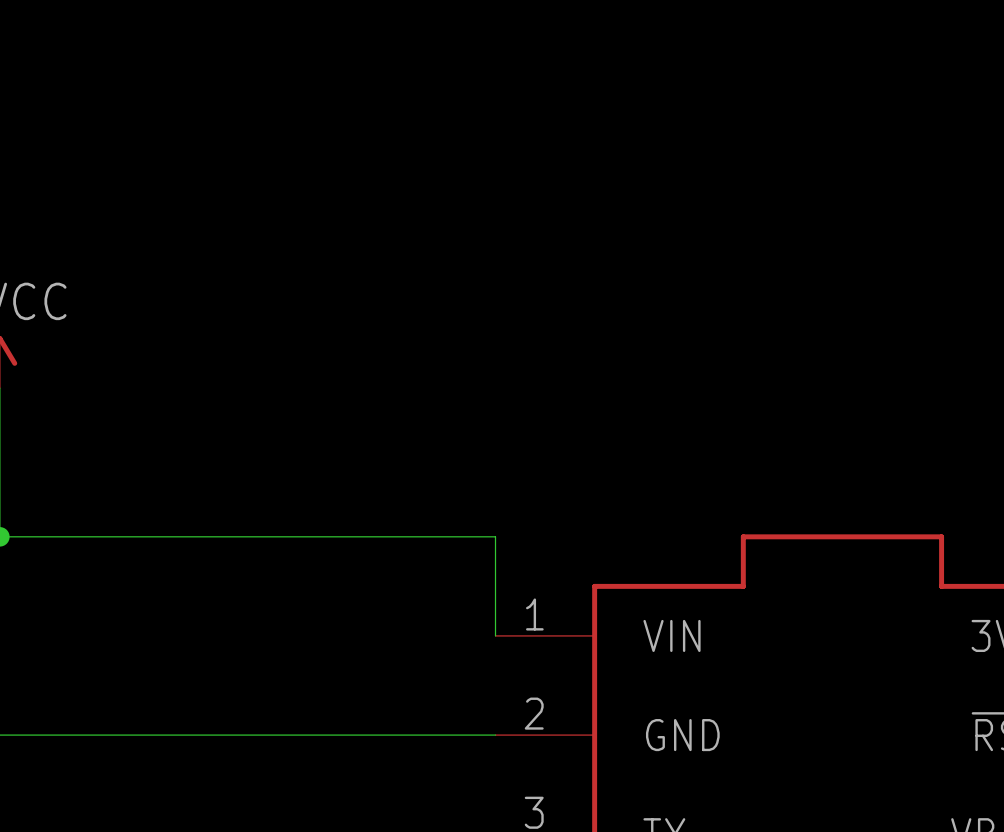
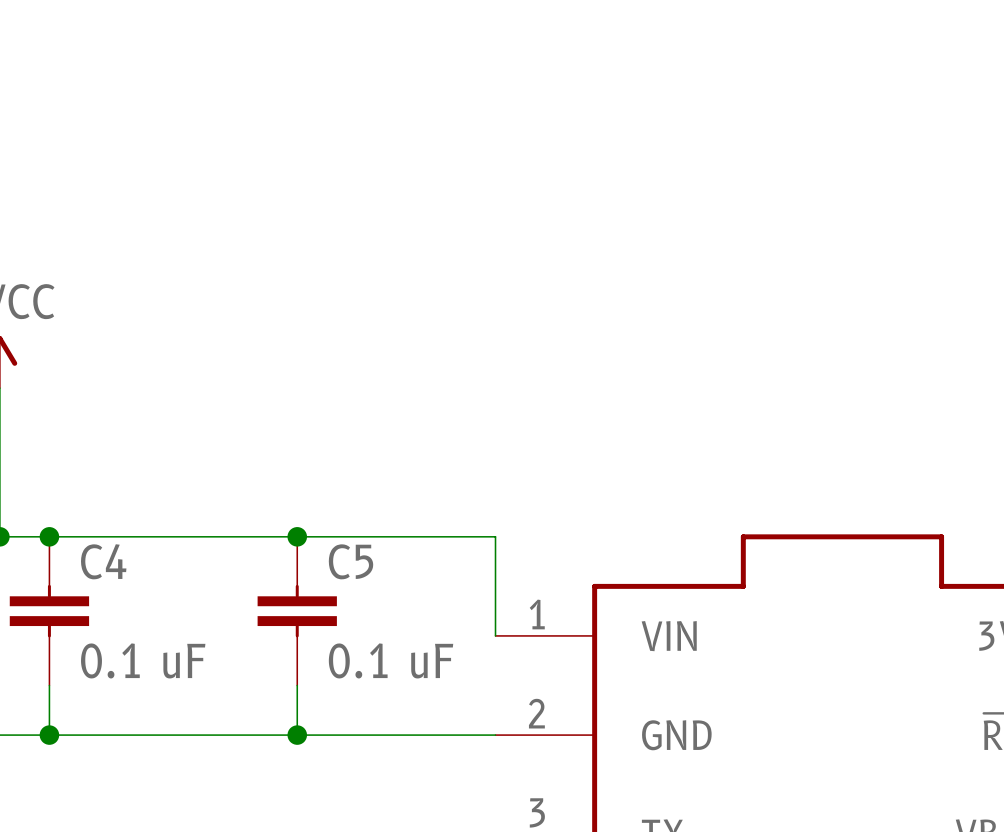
junction: none -> (49, 536)
junction: none -> (297, 536)
C4: none -> 0.1 uF (49, 611)
C5: none -> 0.1 uF (297, 611)
wire: none -> (49, 685) (49, 735)
wire: none -> (297, 685) (297, 735)
junction: none -> (49, 735)
junction: none -> (297, 735)

